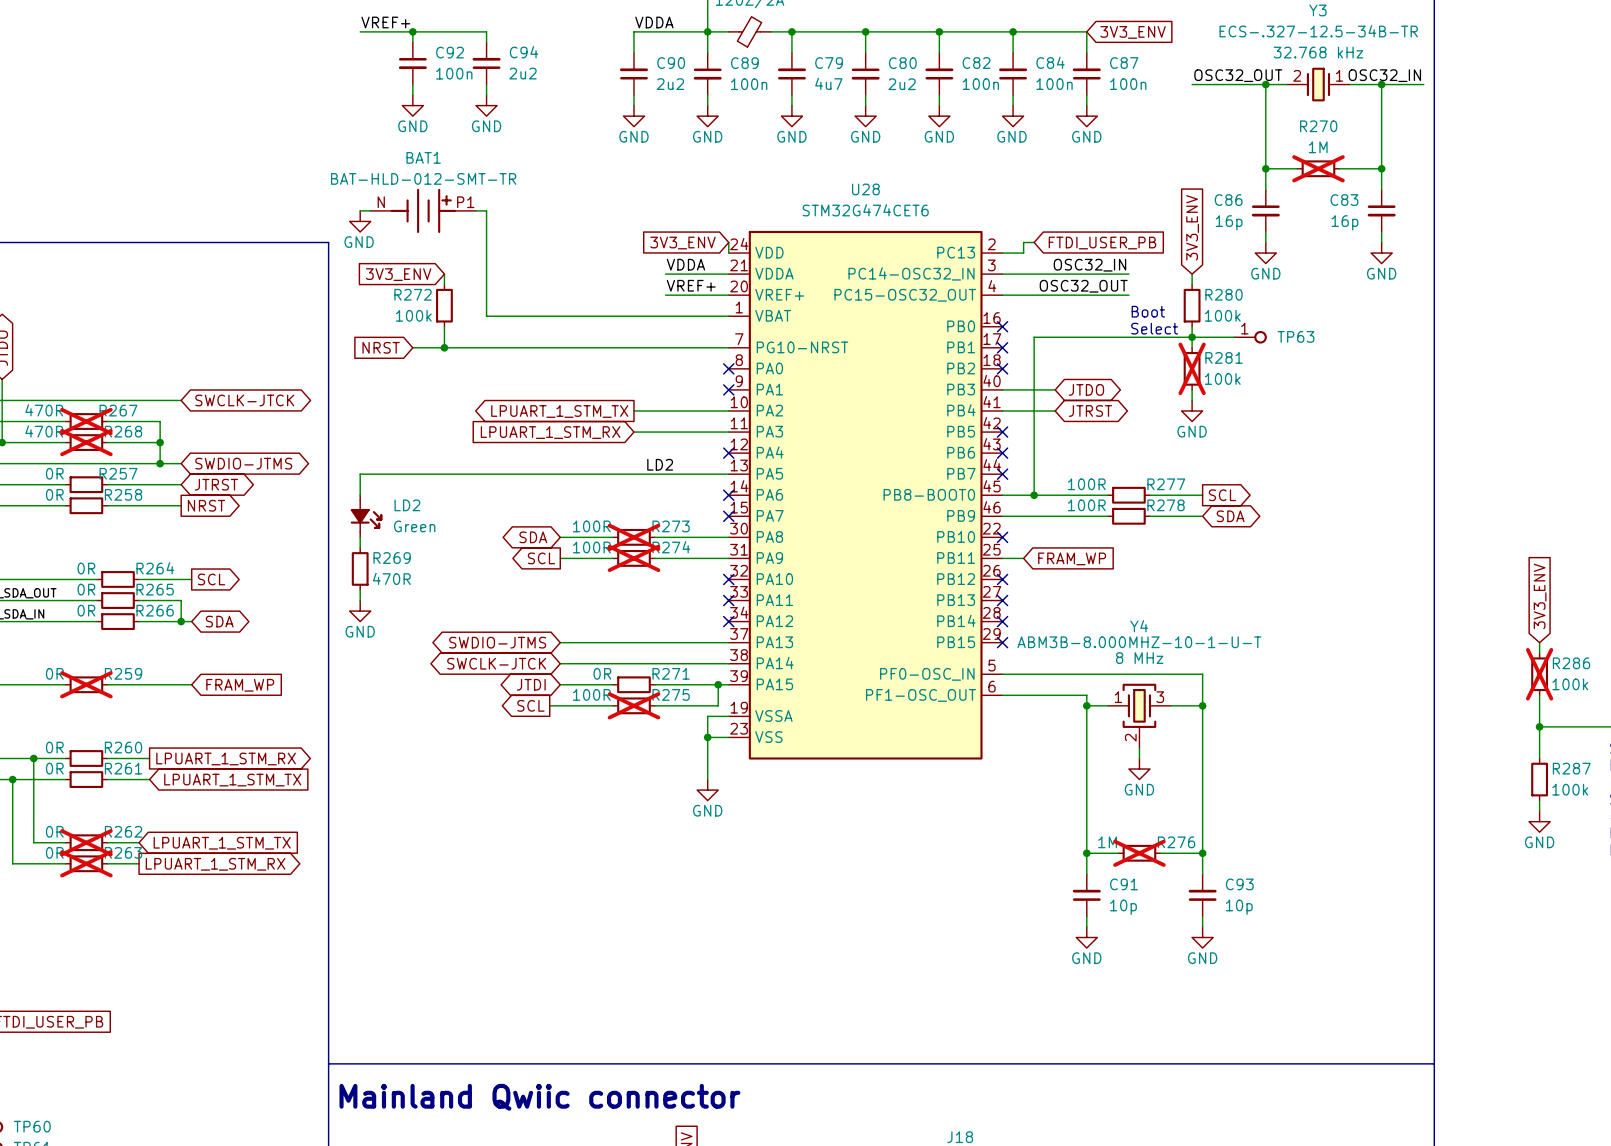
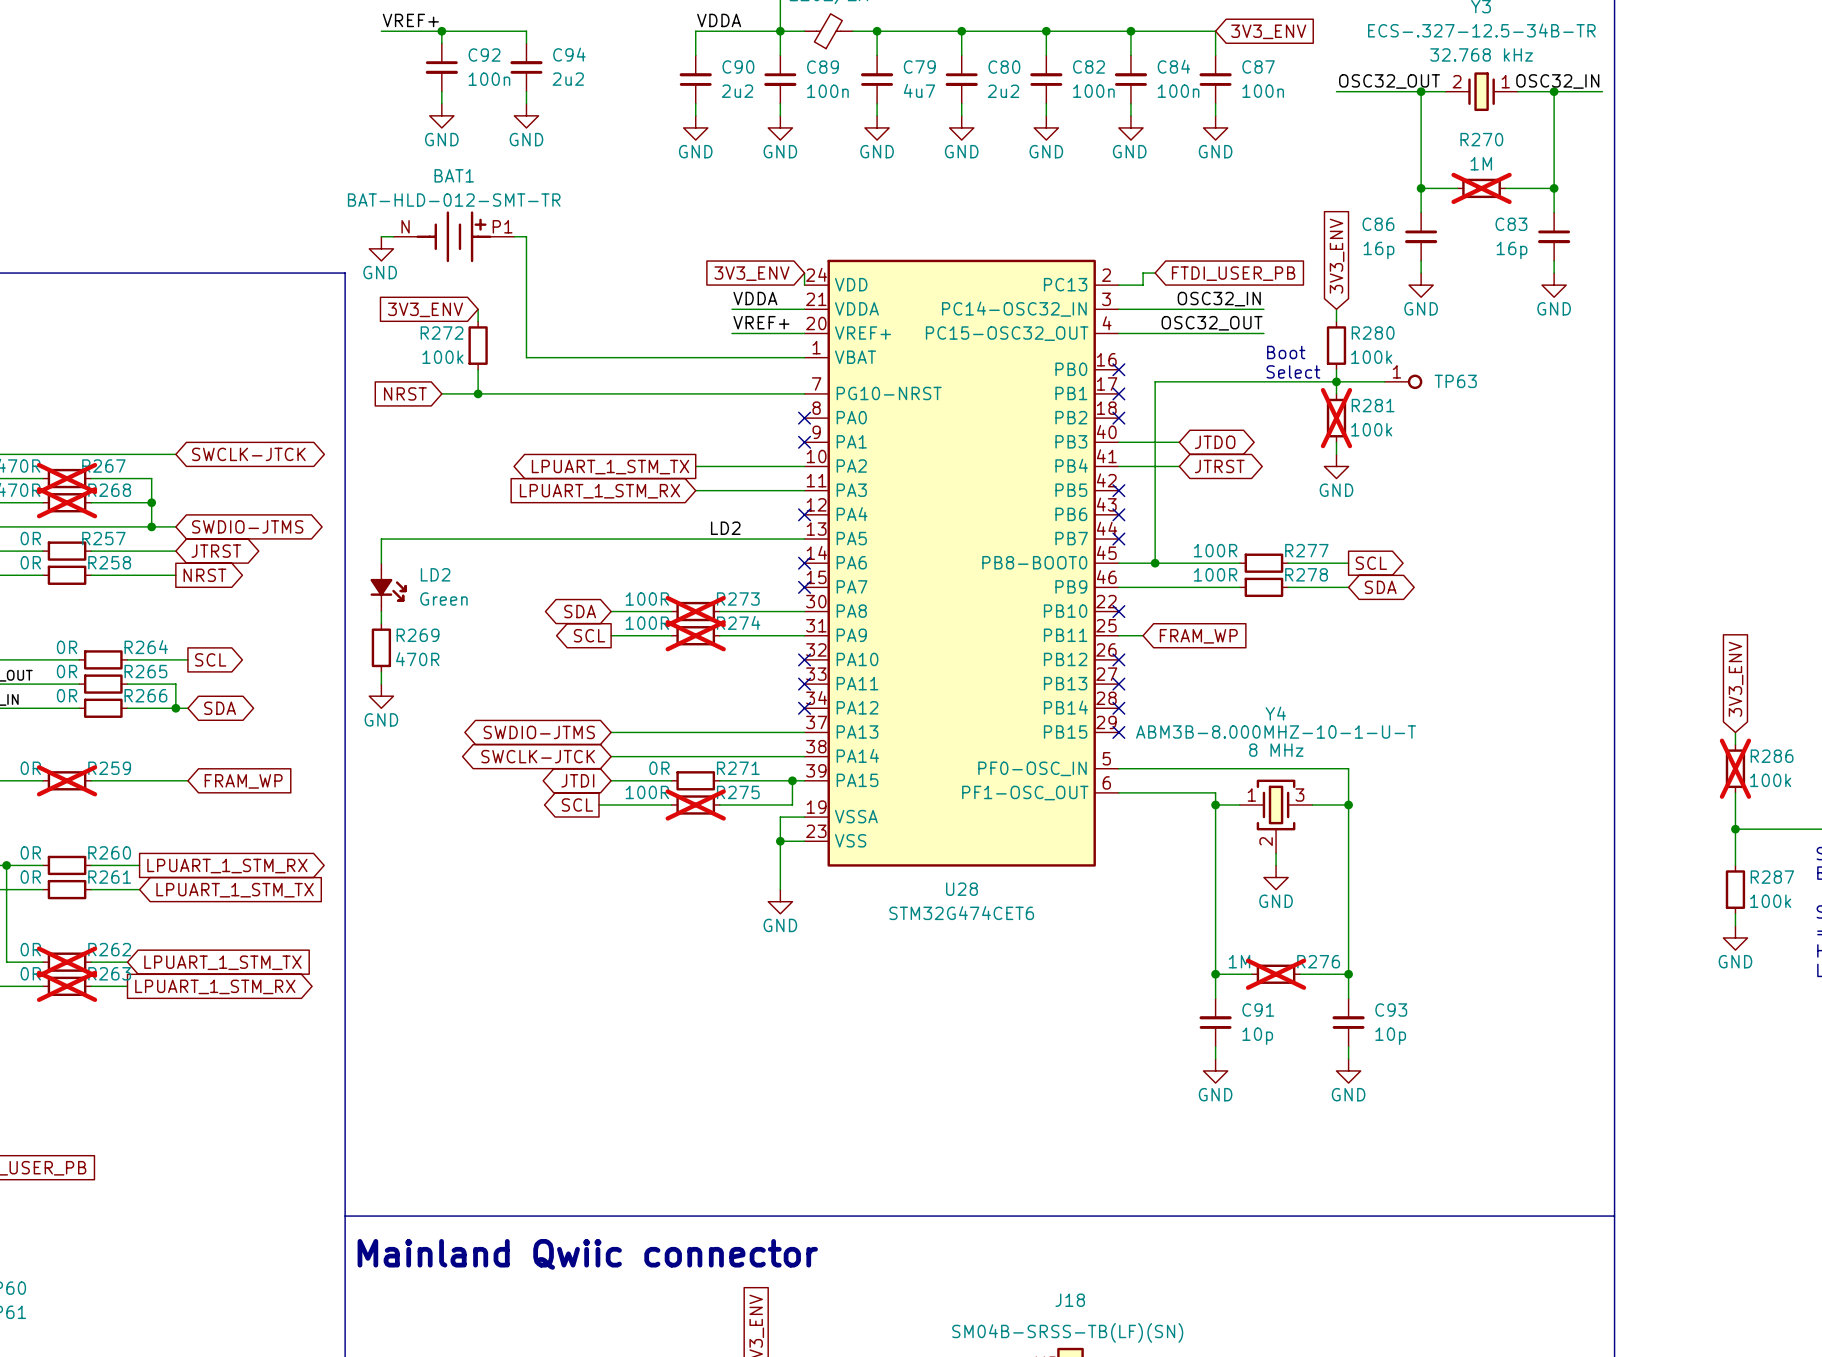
U28 name position: U28 (865, 189) -> U28 (961, 889)
U28 text position: STM32G474CET6 (865, 210) -> STM32G474CET6 (961, 913)

